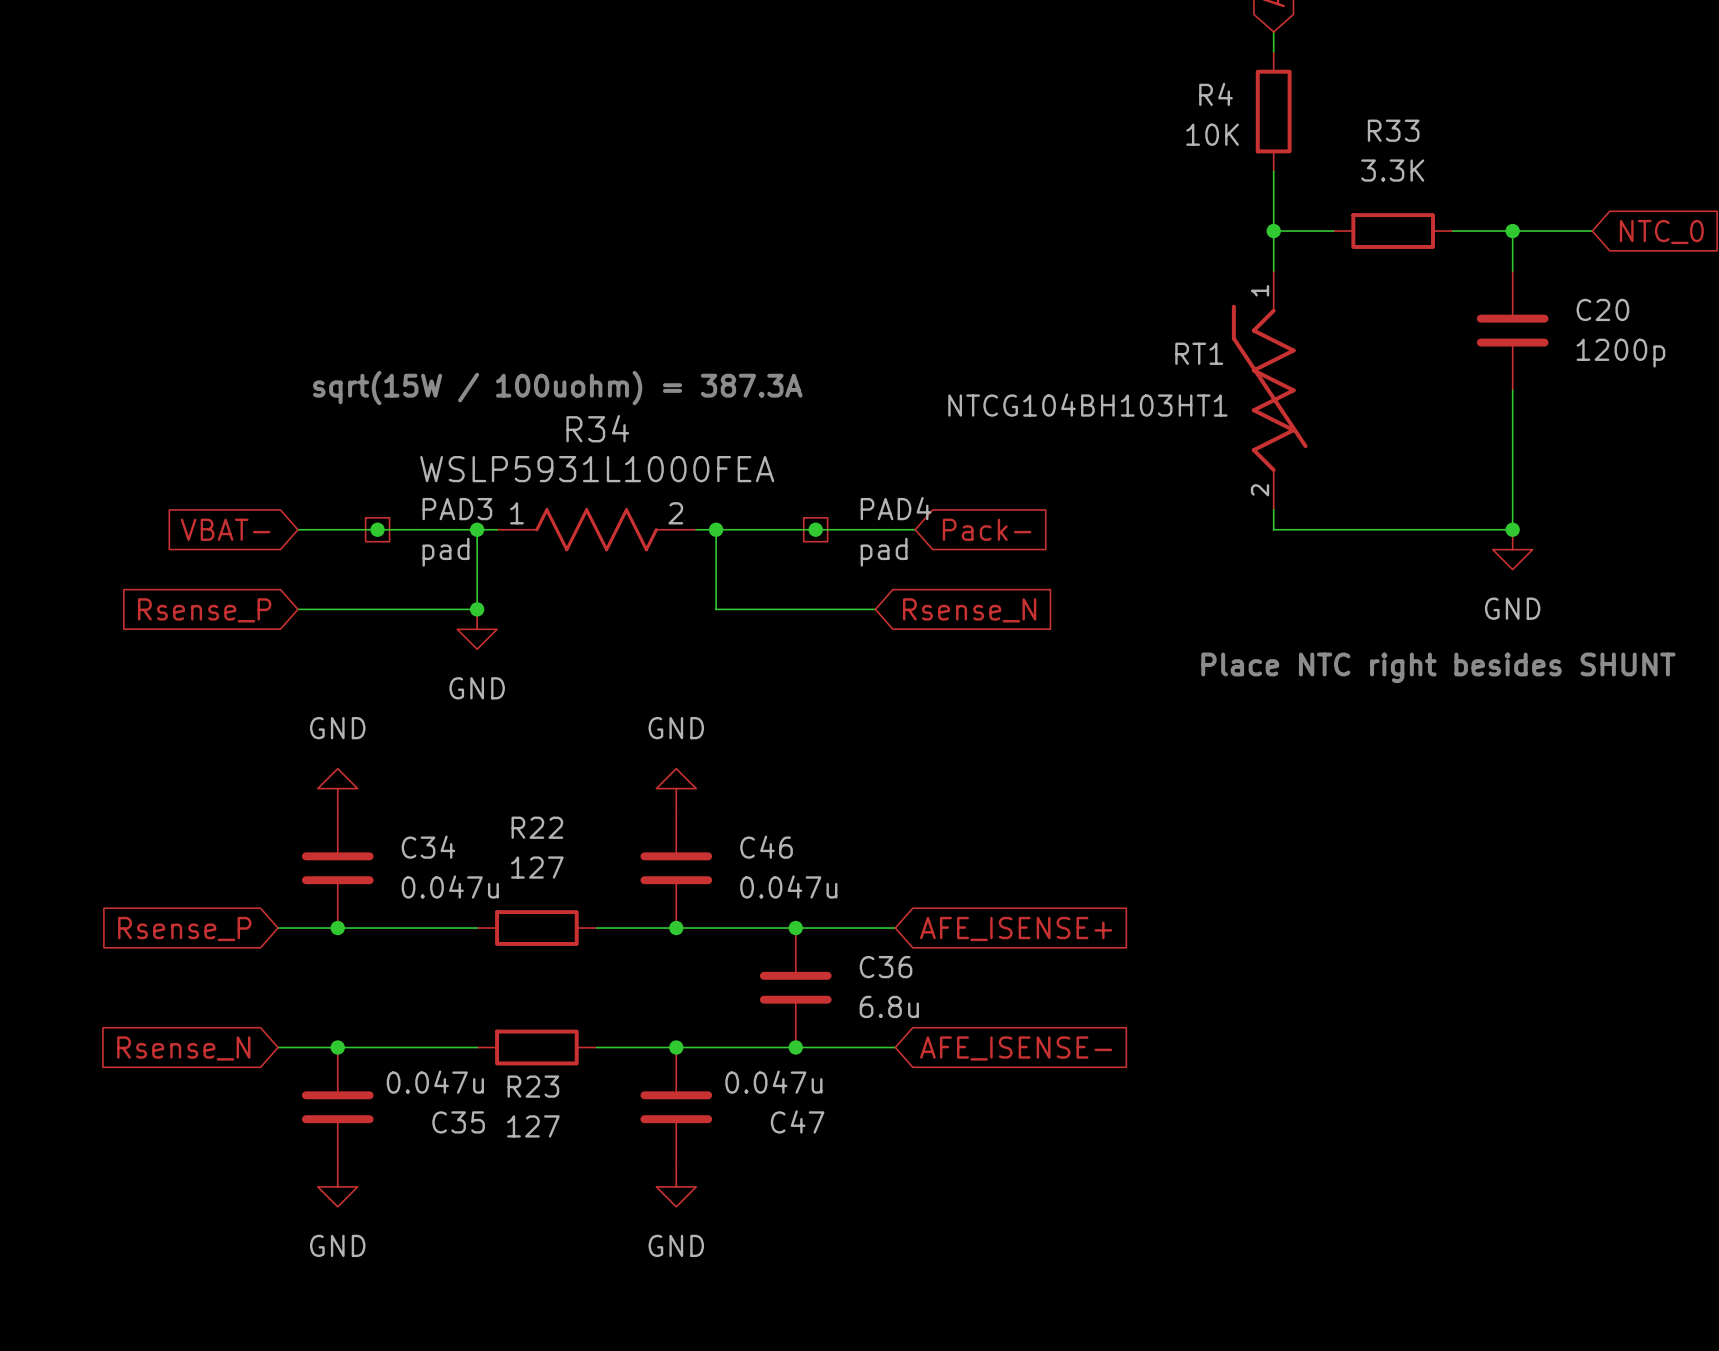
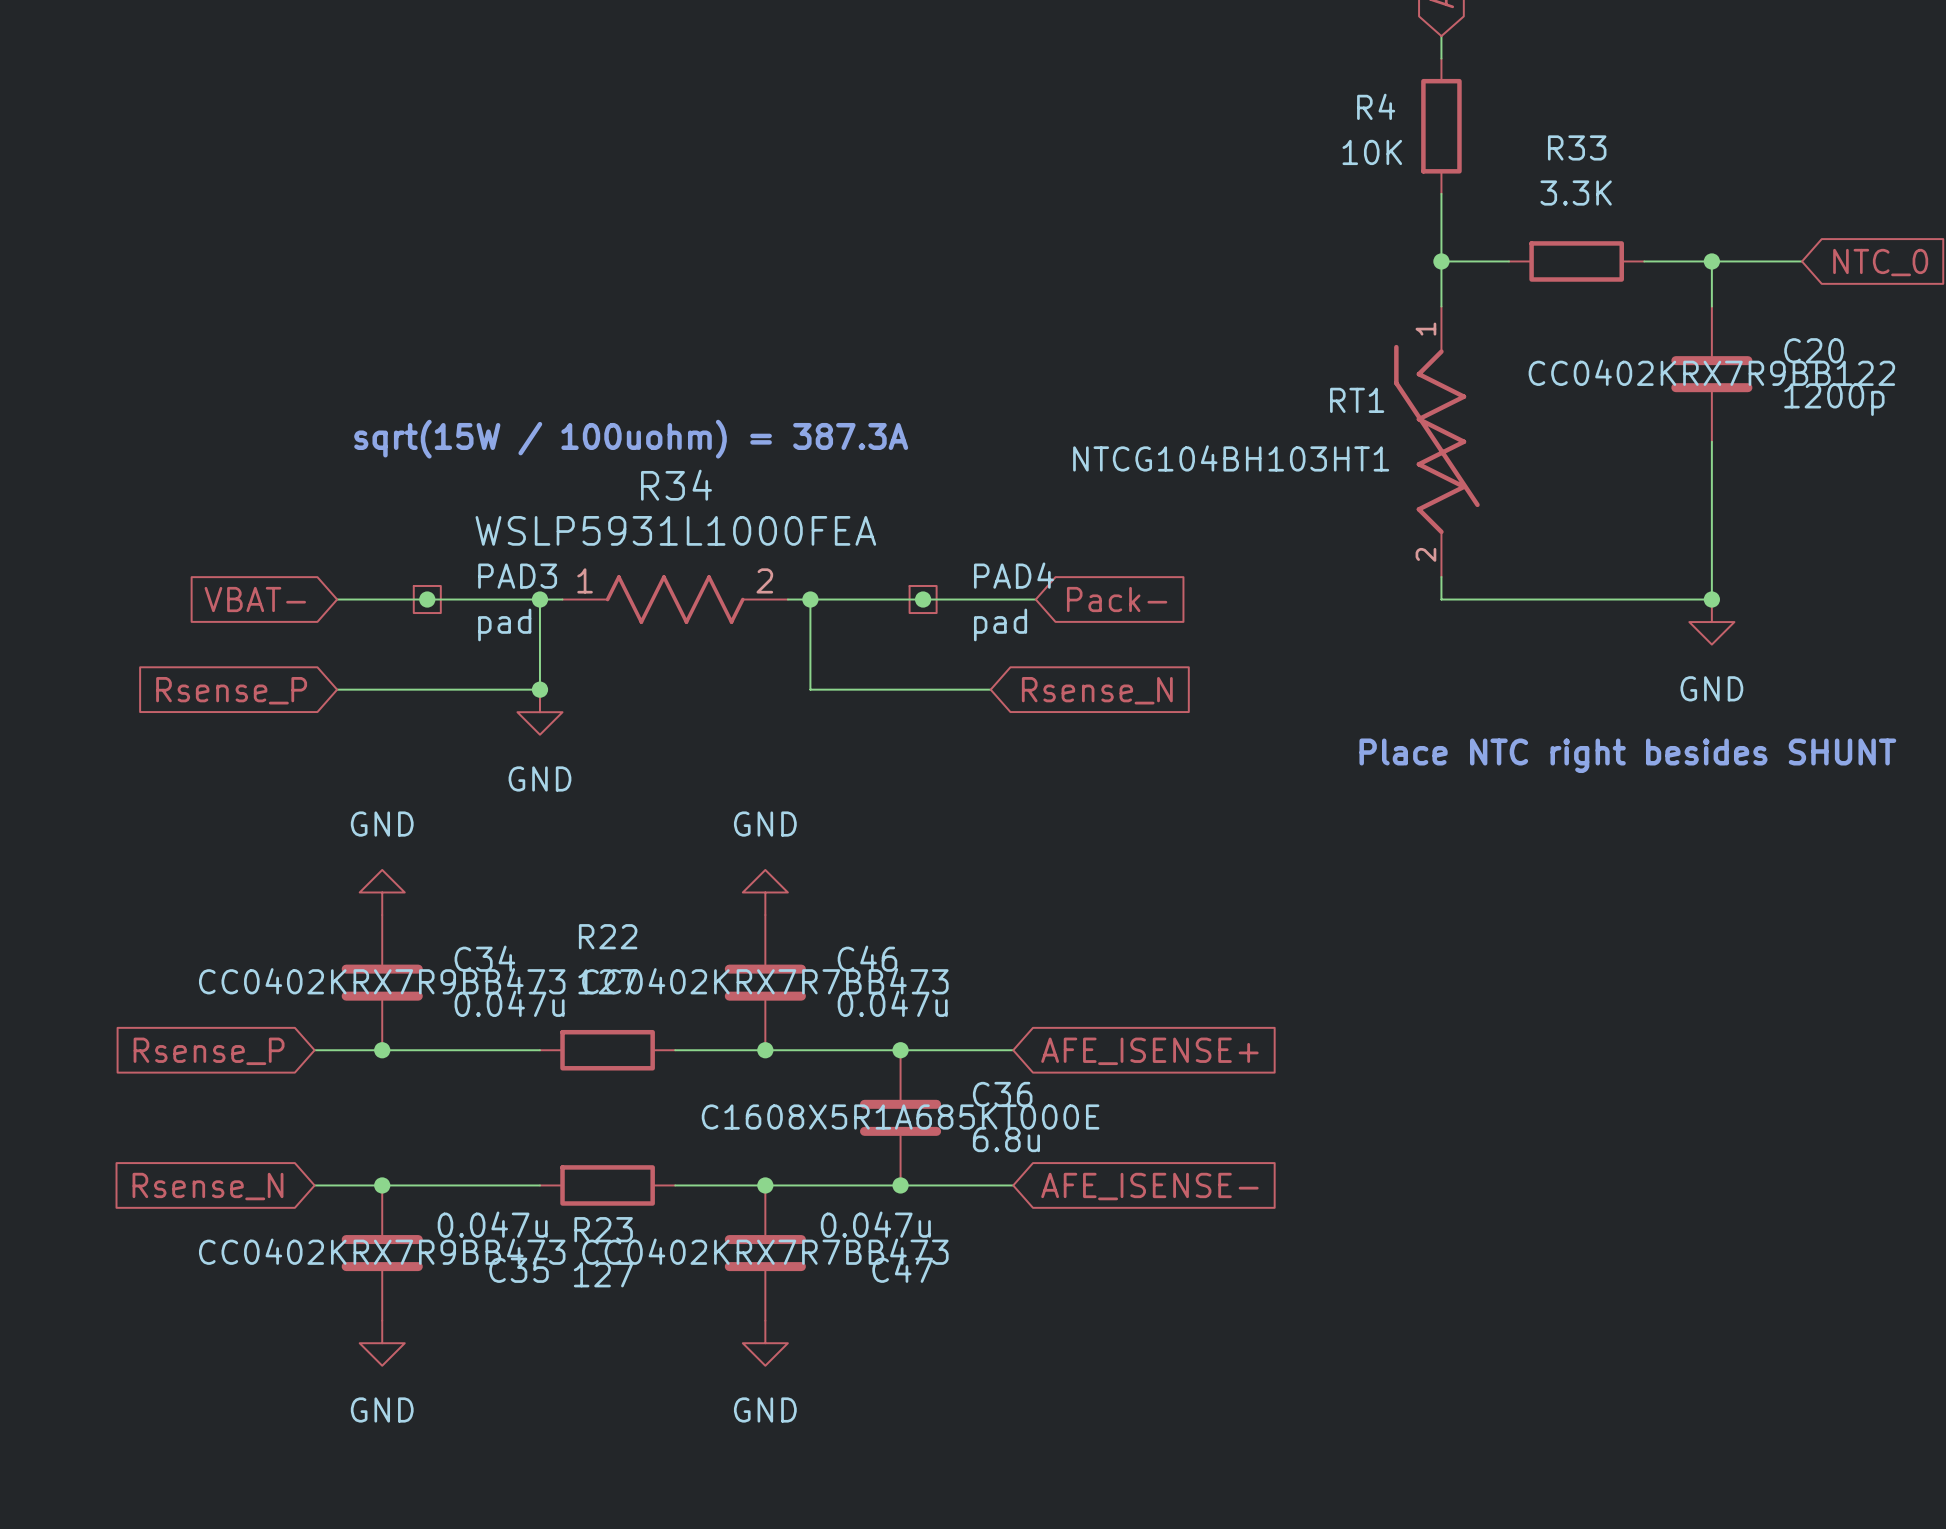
C20 text: none -> CC0402KRX7R9BB122 (1711, 372)
C34 text: none -> CC0402KRX7R9BB473 (382, 981)
C46 text: none -> CC0402KRX7R7BB473 (765, 981)
C36 text: none -> C1608X5R1A685KT000E (900, 1117)
C35 text: none -> CC0402KRX7R9BB473 (382, 1251)
C47 text: none -> CC0402KRX7R7BB473 (765, 1251)

